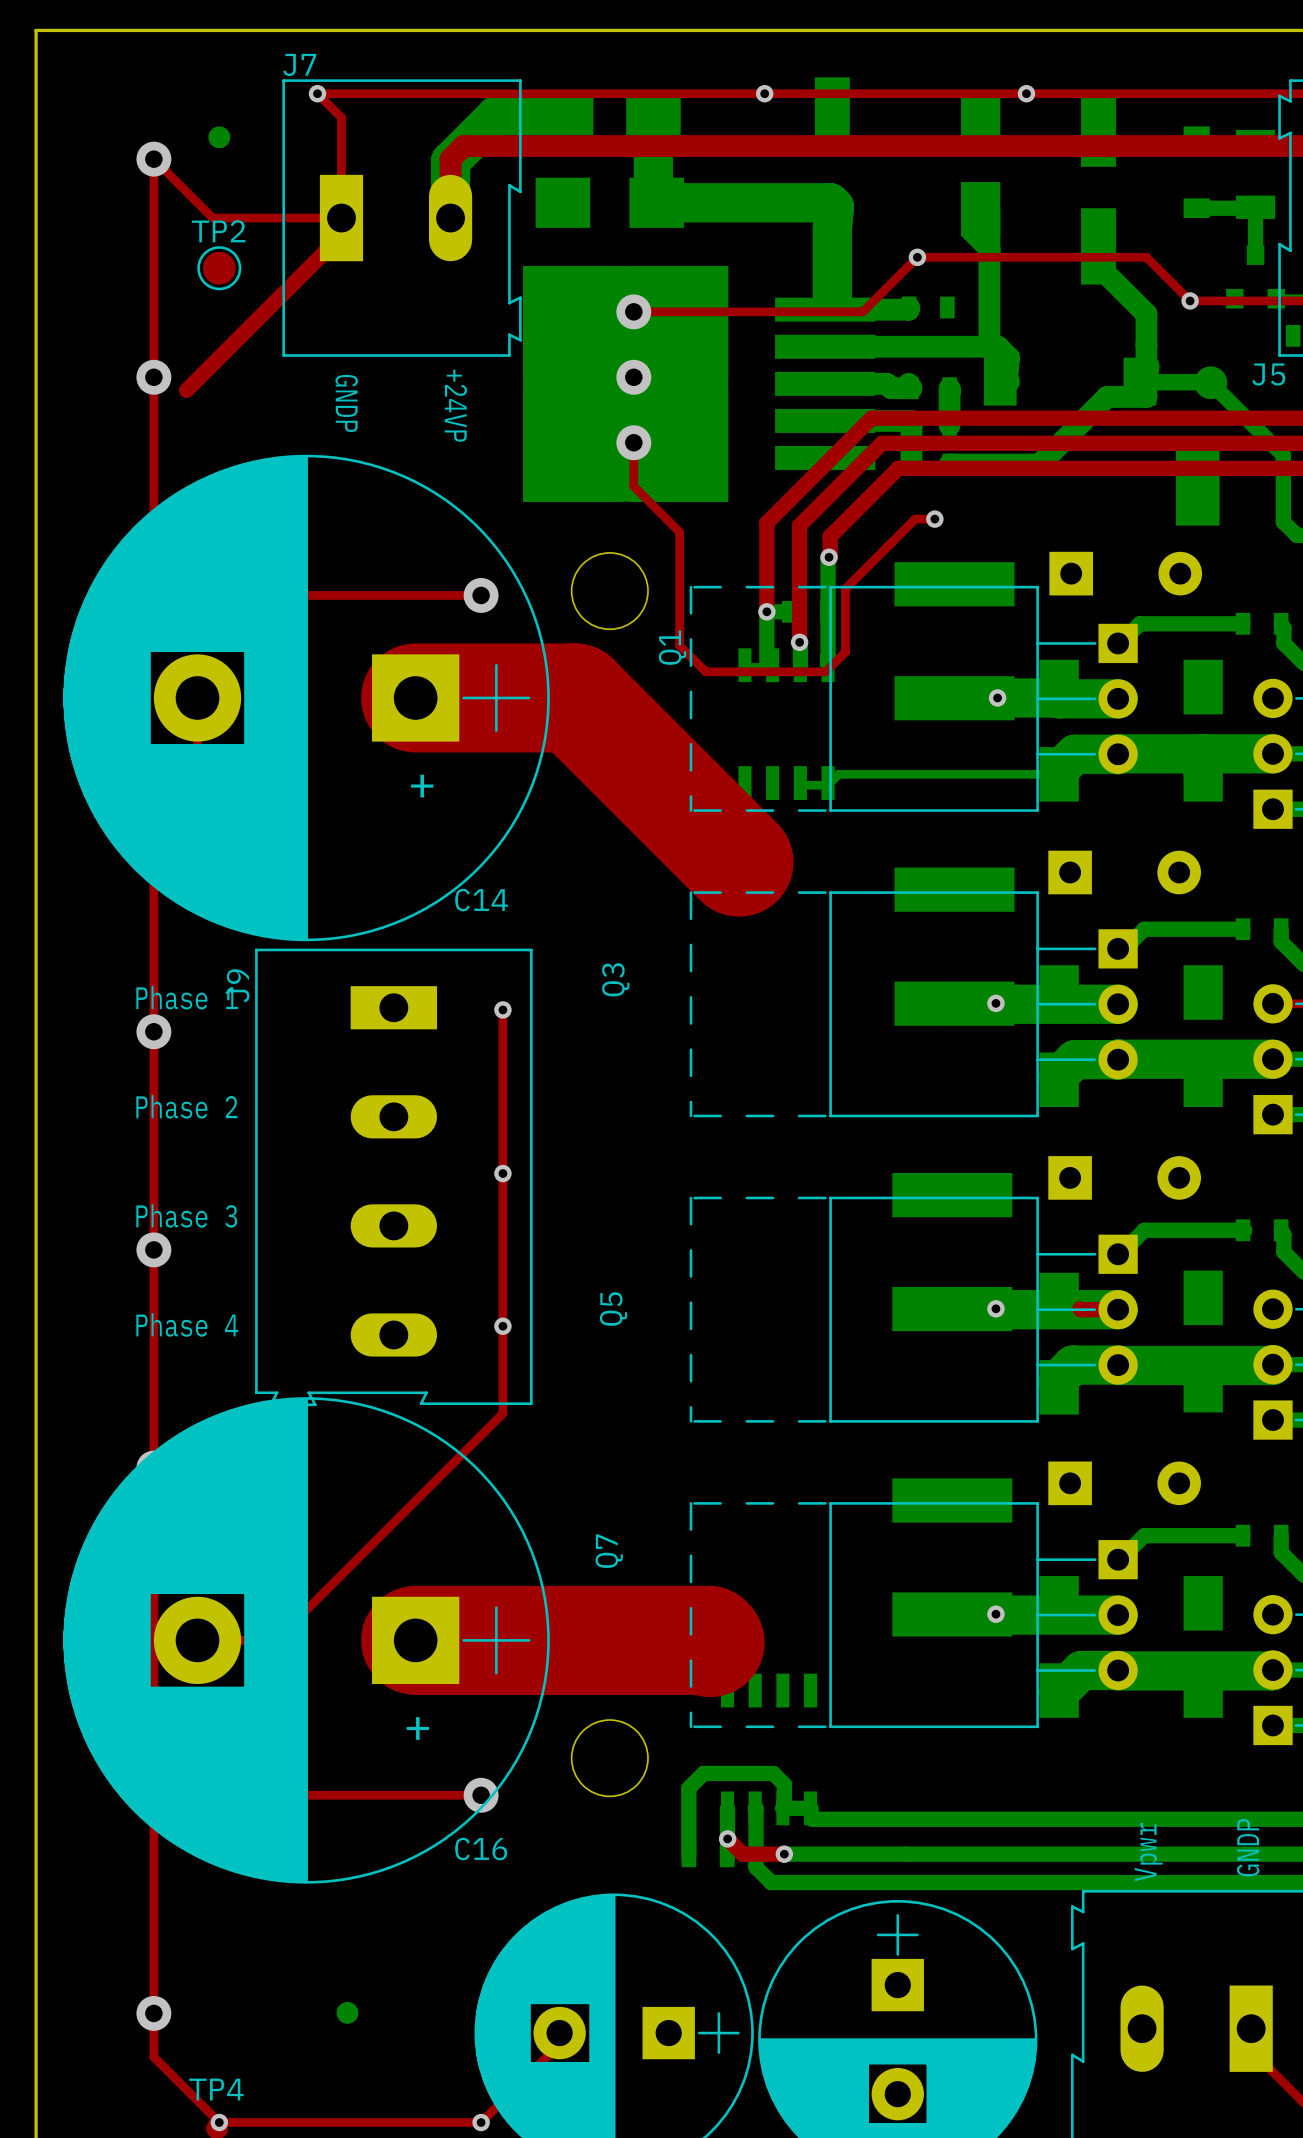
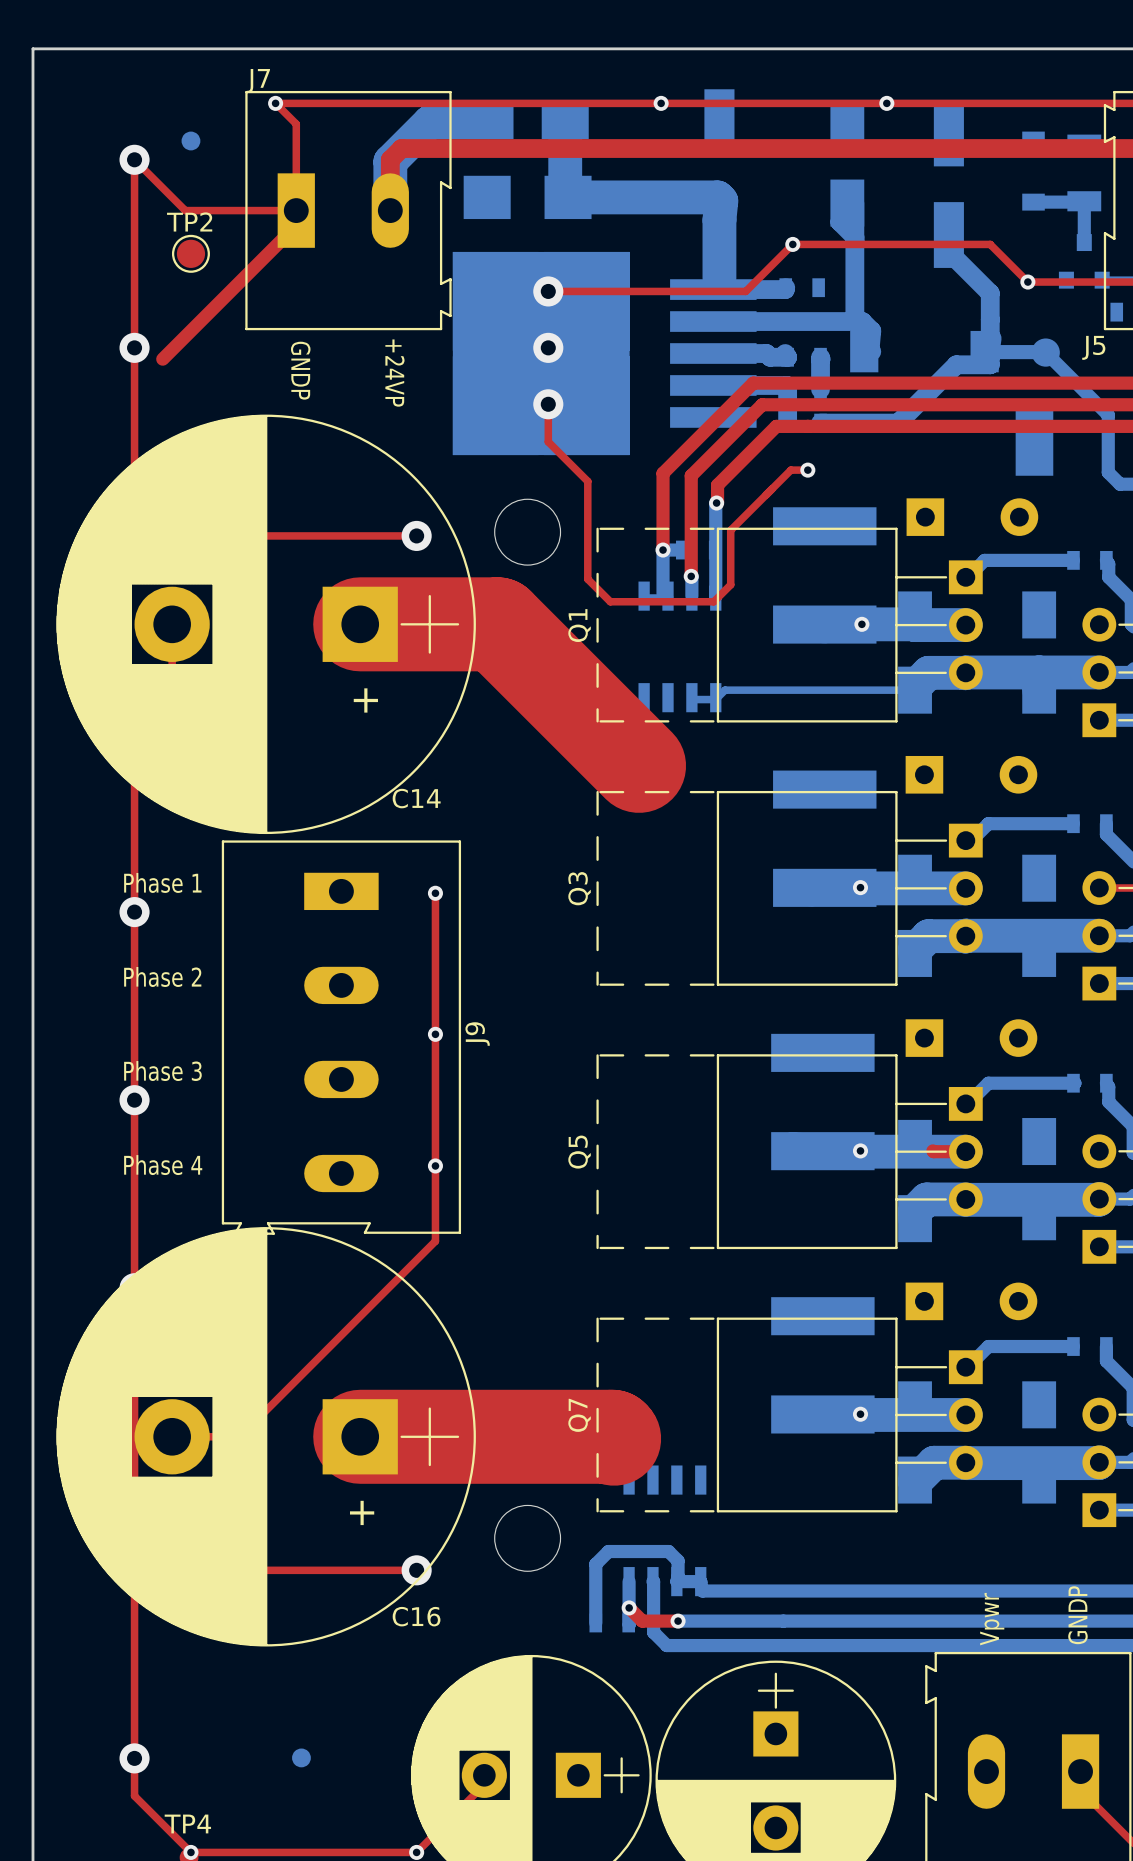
Q1 name position: Q1 (672, 647) -> Q1 (579, 625)
Q3 name position: Q3 (615, 979) -> Q3 (579, 888)
J9 name position: J9 (238, 985) -> J9 (477, 1034)
Q5 name position: Q5 (613, 1308) -> Q5 (579, 1152)
Q7 name position: Q7 (609, 1551) -> Q7 (579, 1415)

